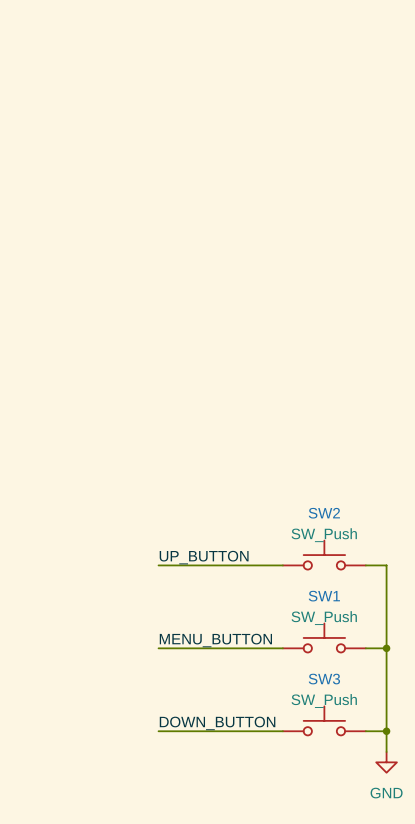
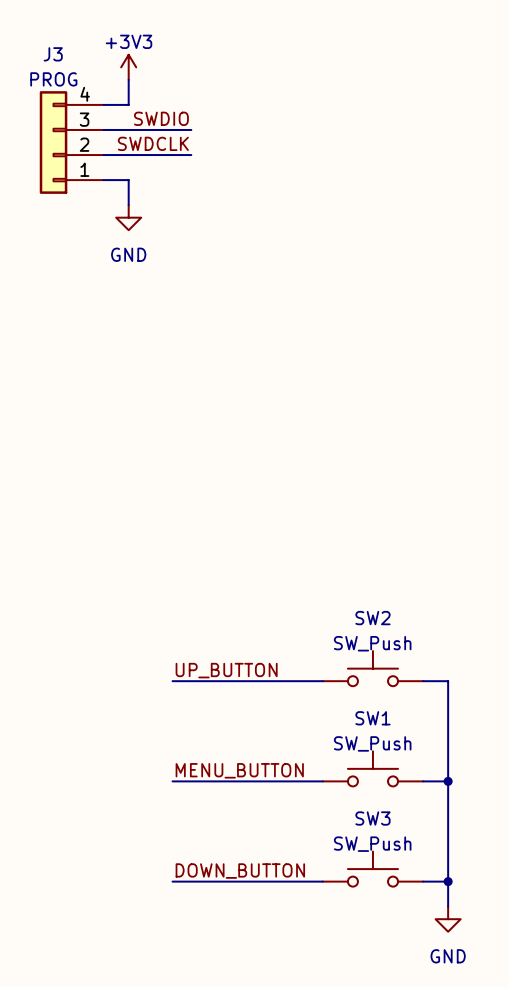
power symbol: none -> +3V3 (128, 67)
wire: none -> (128, 79) (128, 104) (103, 104)
label: none -> SWDIO (161, 118)
wire: none -> (103, 129) (191, 129)
J3: none -> PROG (71, 142)
label: none -> SWDCLK (153, 143)
wire: none -> (103, 155) (191, 155)
wire: none -> (103, 180) (128, 180) (128, 205)
power symbol: none -> GND (128, 217)

